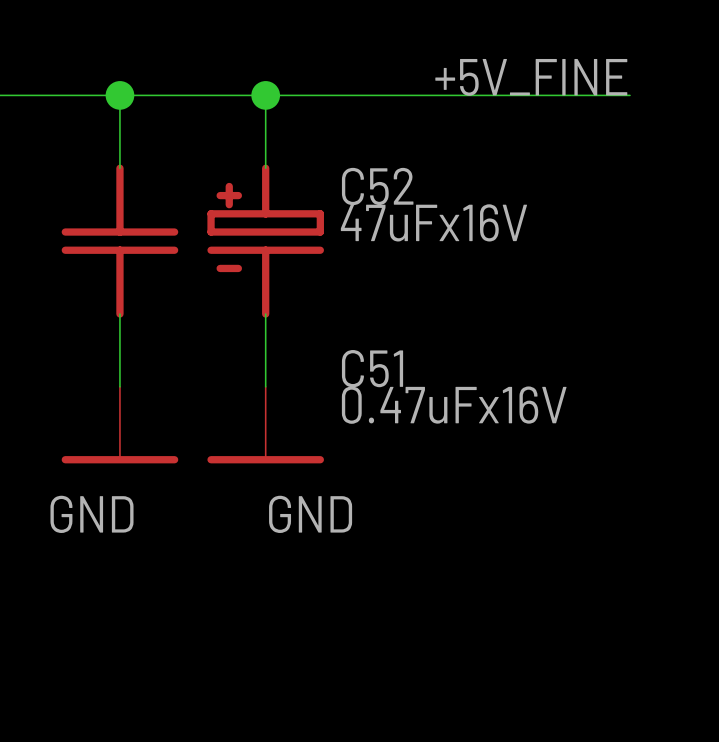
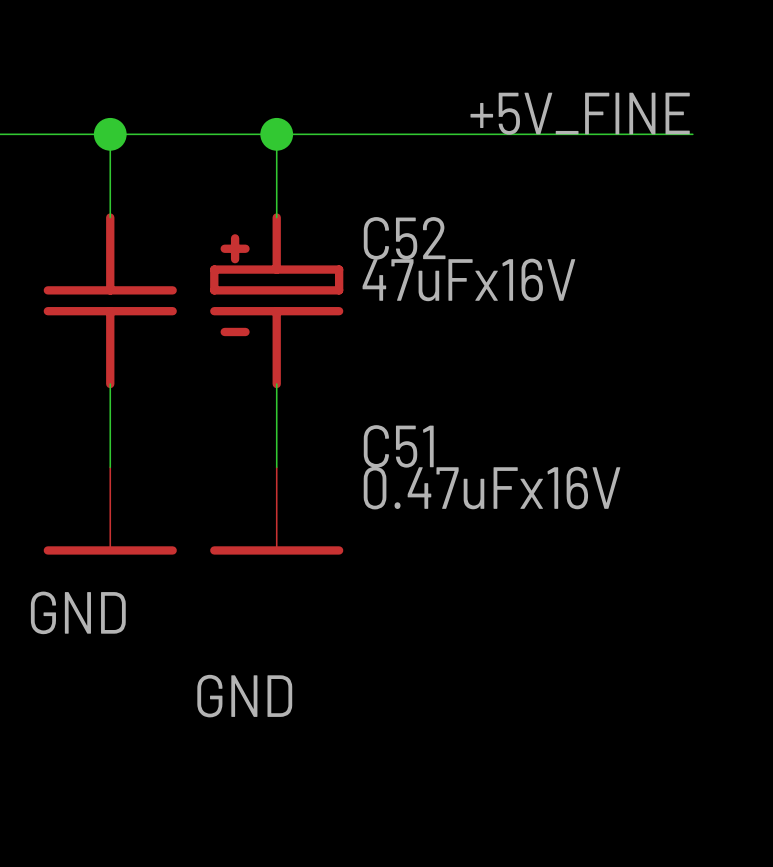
power symbol text position: GND (310, 514) -> GND (244, 696)

